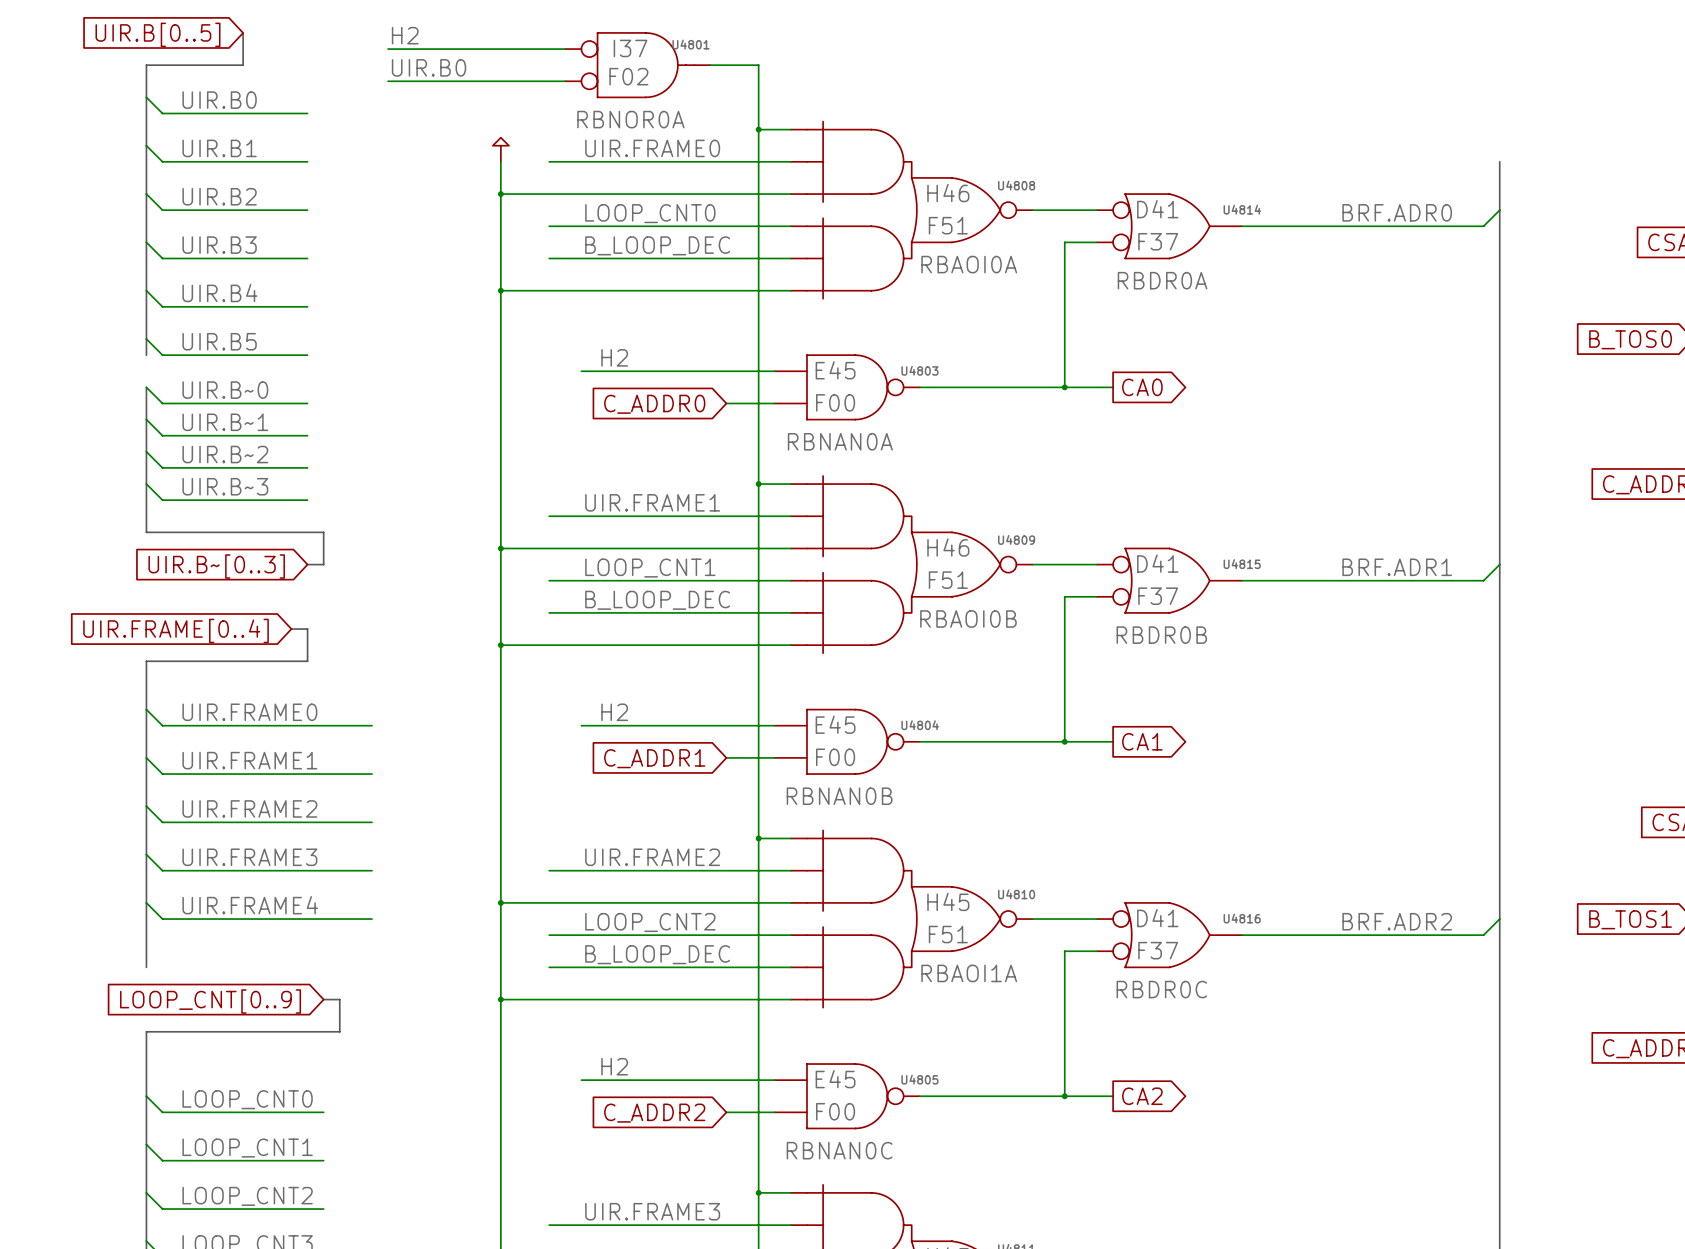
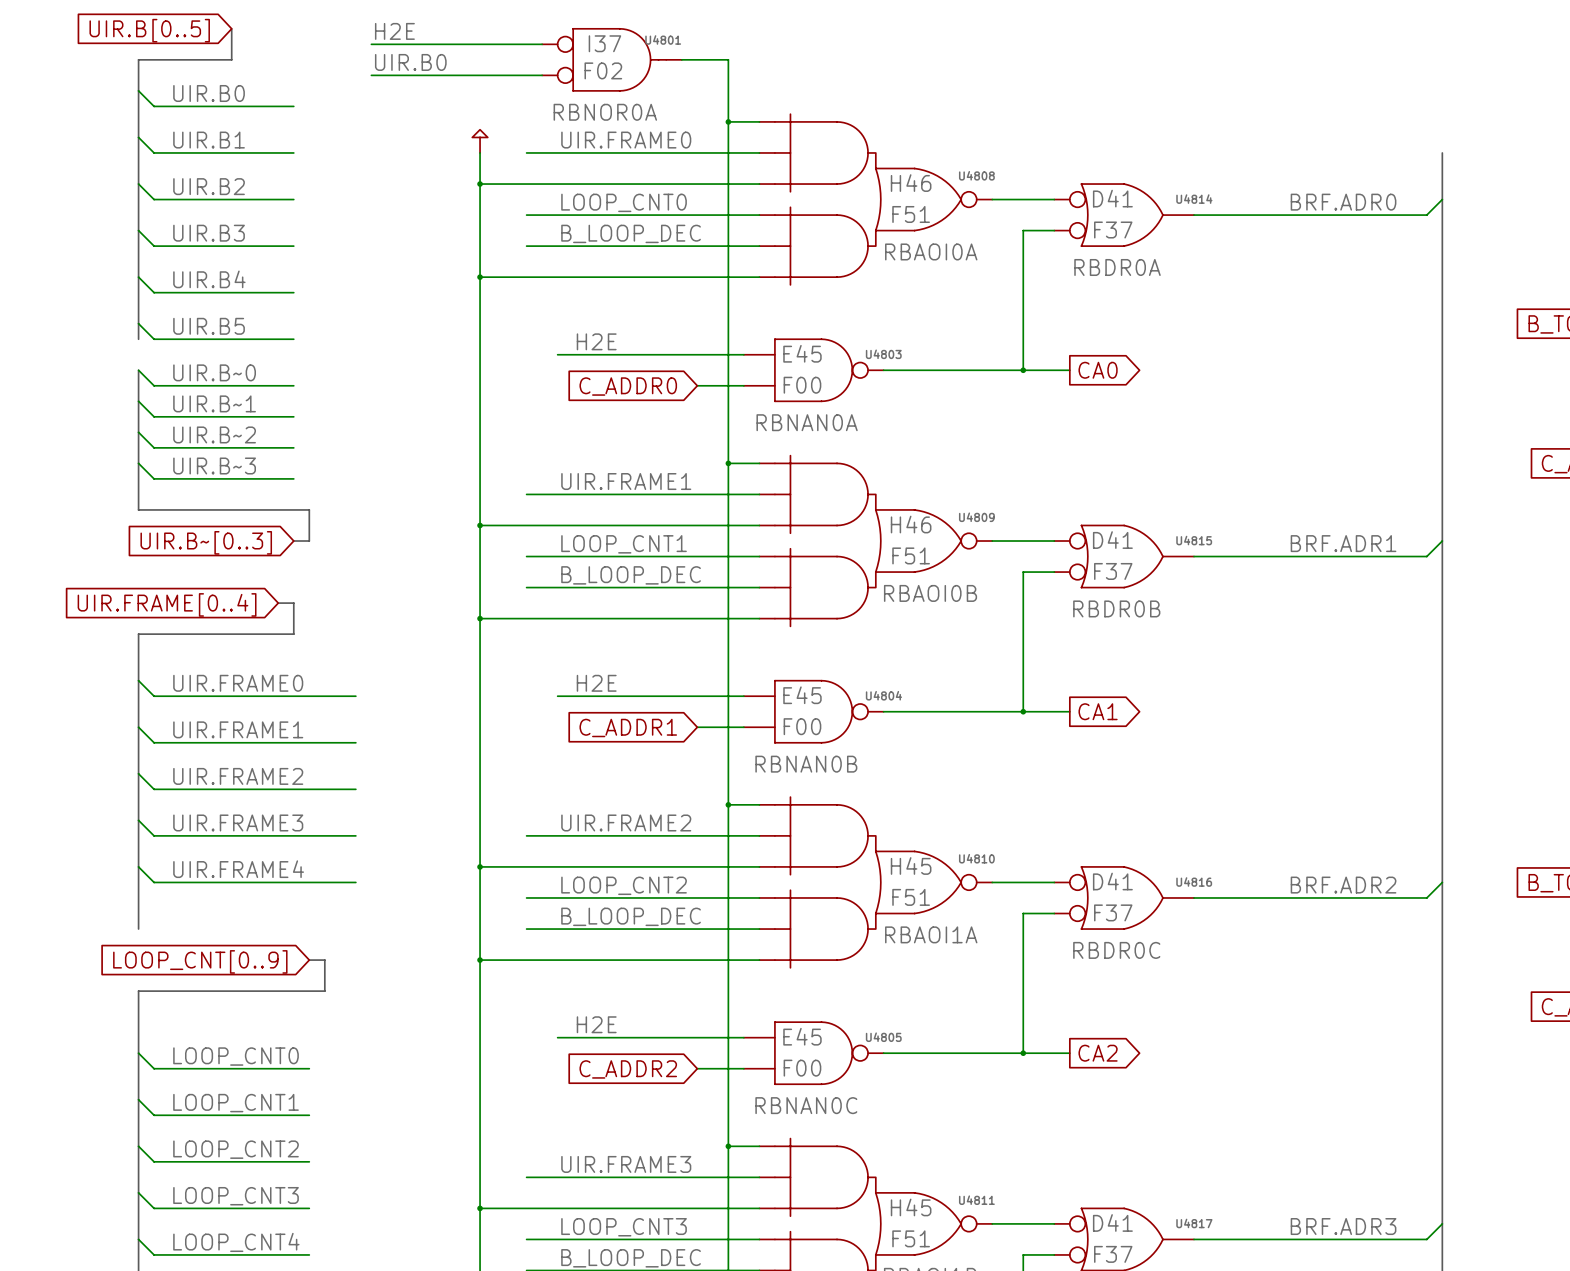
label: H2 (405, 35) -> H2E (394, 31)
label: H2 (614, 357) -> H2E (596, 341)
label: H2 (614, 712) -> H2E (596, 683)
label: H2 (614, 1066) -> H2E (596, 1024)

